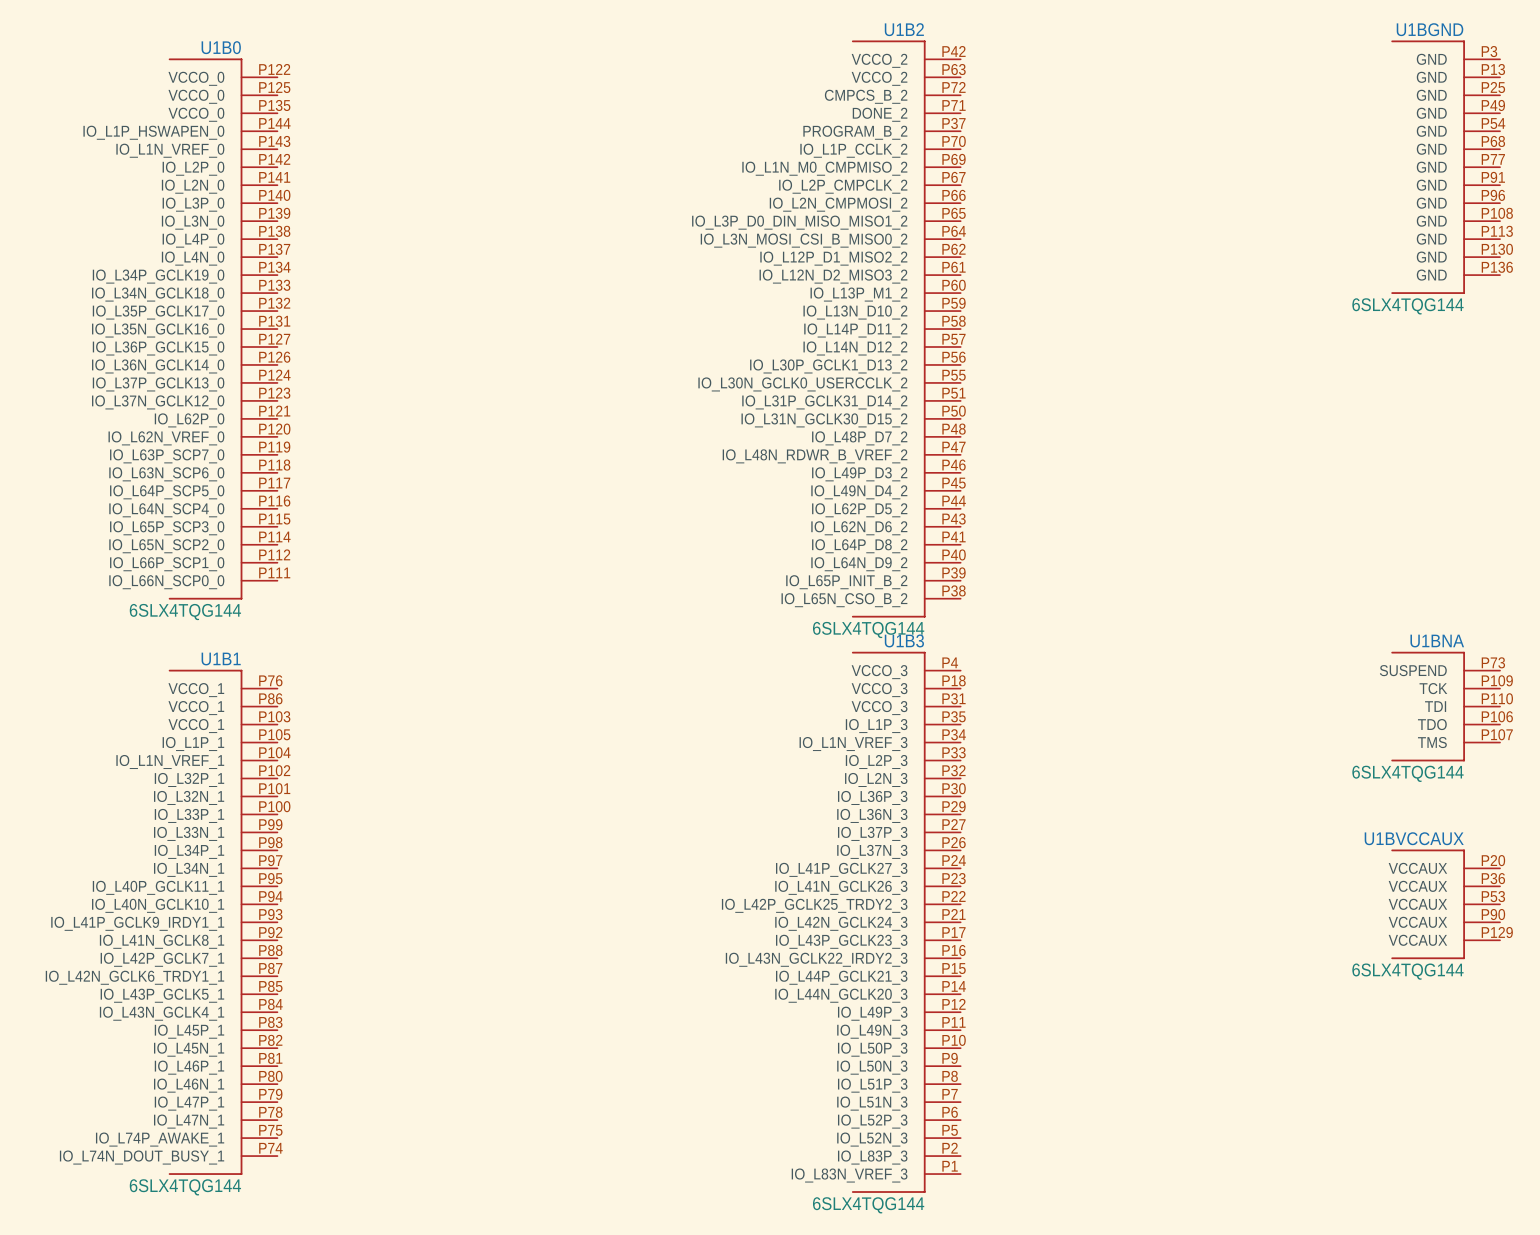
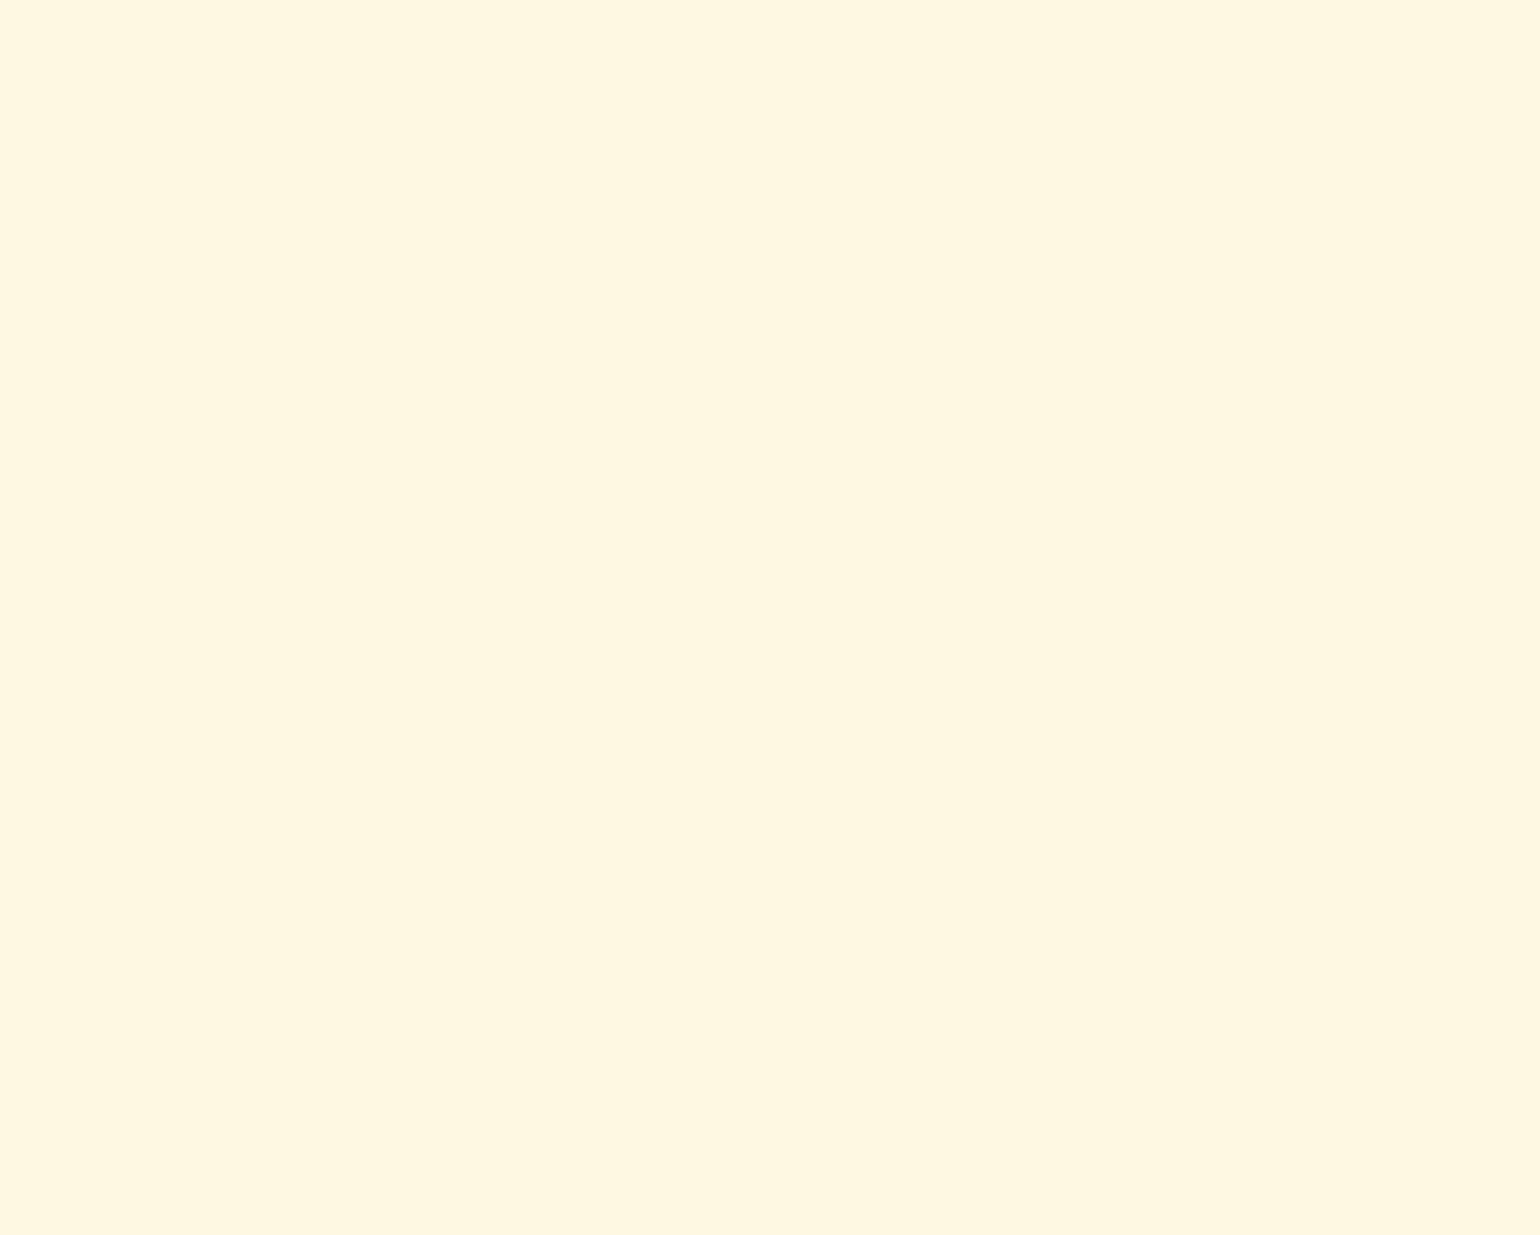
U1BGND: 6SLX4TQG144 (1445, 167) -> none
U1B0: 6SLX4TQG144 (223, 329) -> none
U1B2: 6SLX4TQG144 (906, 329) -> none
U1BNA: 6SLX4TQG144 (1445, 706) -> none
U1BVCCAUX: 6SLX4TQG144 (1445, 904) -> none
U1B1: 6SLX4TQG144 (223, 922) -> none
U1B3: 6SLX4TQG144 (906, 922) -> none

